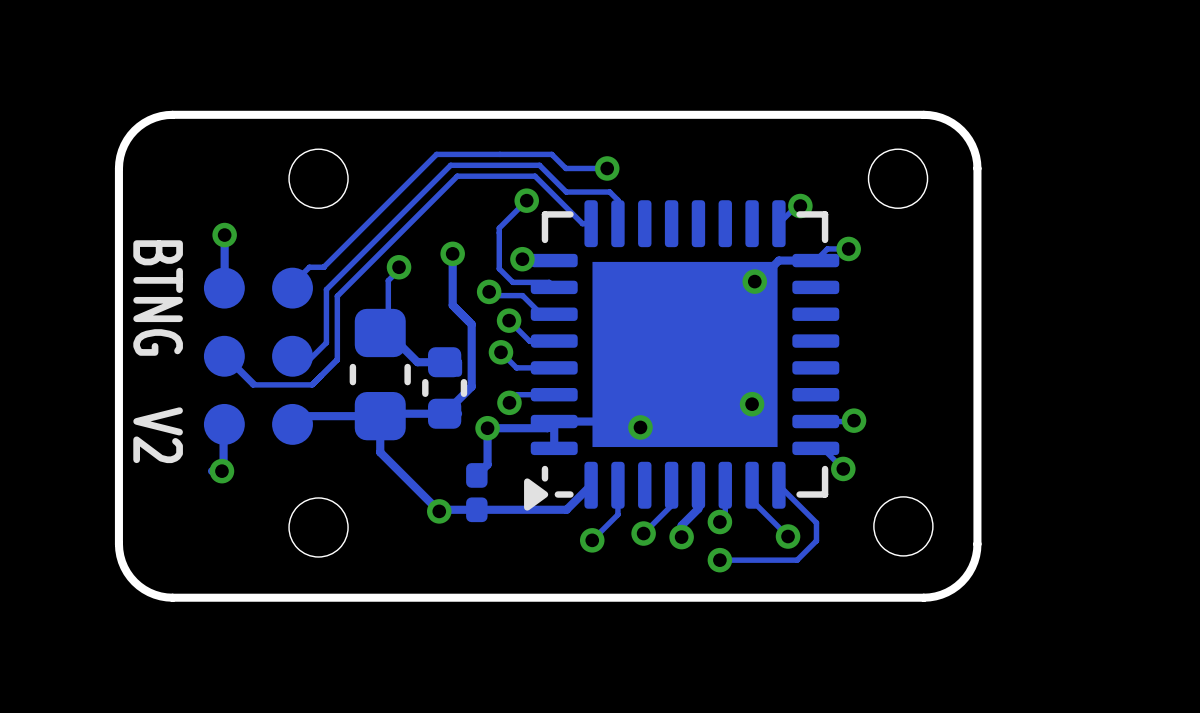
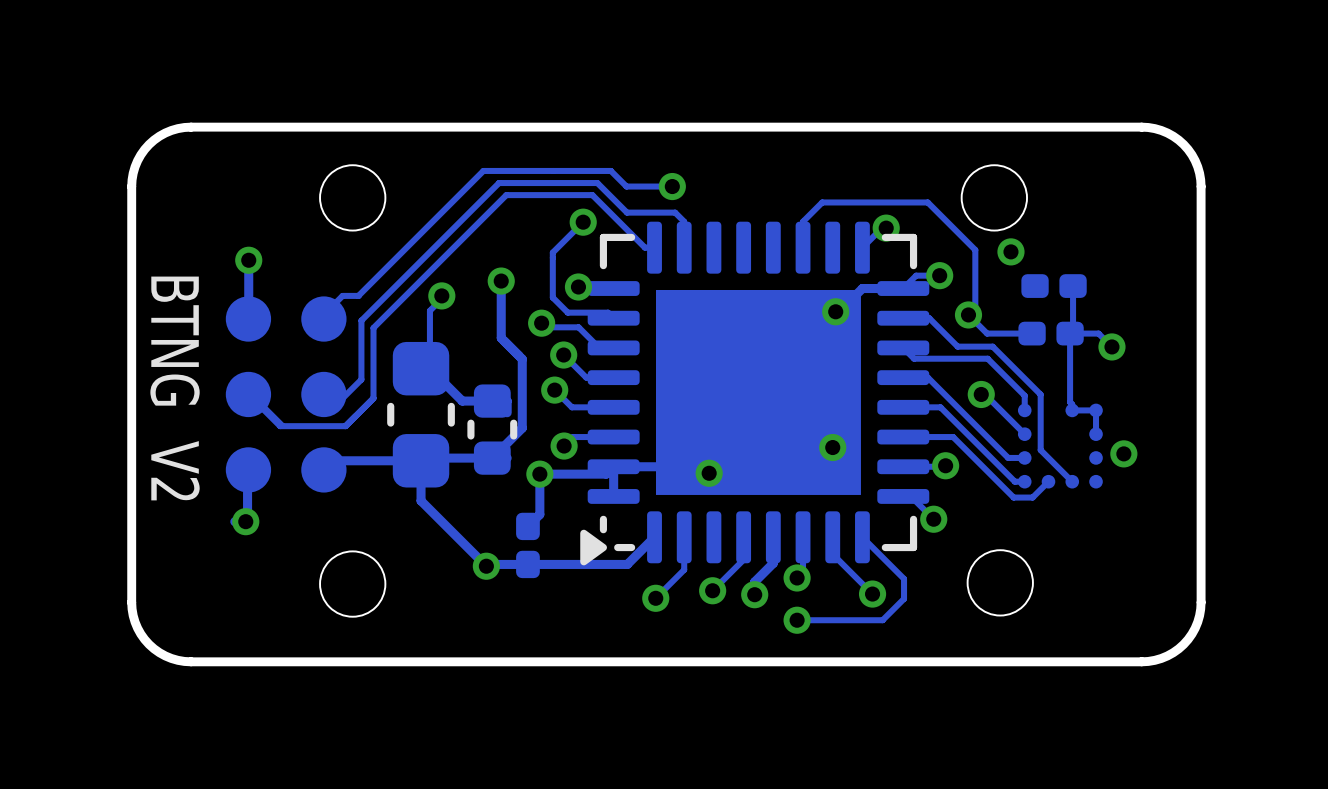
board edge: (923, 114) (941, 117) (961, 130) (972, 145) (977, 168) (977, 550) (972, 567) (957, 586) (941, 594) (923, 597) -> (1022, 127) (1141, 127) (1161, 130) (1178, 140) (1188, 149) (1197, 166) (1201, 186) (1201, 602) (1197, 622) (1188, 639) (1178, 648) (1154, 660) (1022, 661)
track: none -> (803, 247) (803, 221) (822, 202) (927, 202) (975, 250) (975, 308) (968, 314) (987, 333) (1032, 333)
via: none -> (1010, 251)
part: none -> (1054, 286)
track: none -> (1073, 286) (1073, 330) (1070, 333)
via: none -> (968, 314)
track: none -> (903, 318) (929, 318) (957, 346) (992, 346) (1040, 394) (1040, 450) (1072, 481)
part: none -> (1051, 333)
track: none -> (1070, 333) (1098, 333) (1111, 346)
track: none -> (1070, 333) (1070, 402) (1072, 404) (1072, 410) (1096, 410) (1096, 434)
via: none -> (1111, 346)
track: none -> (903, 347) (914, 358) (987, 358) (1024, 395) (1024, 410)
track: none -> (903, 377) (927, 377) (1008, 457) (1024, 457)
track: none -> (981, 394) (985, 394) (1024, 434)
via: none -> (981, 394)
track: none -> (906, 410) (903, 407) (940, 407) (1014, 481) (1024, 481)
track: none -> (906, 434) (903, 437) (953, 437) (1013, 497) (1032, 497) (1048, 481)
part: none -> (1060, 446)
via: none -> (1123, 453)

